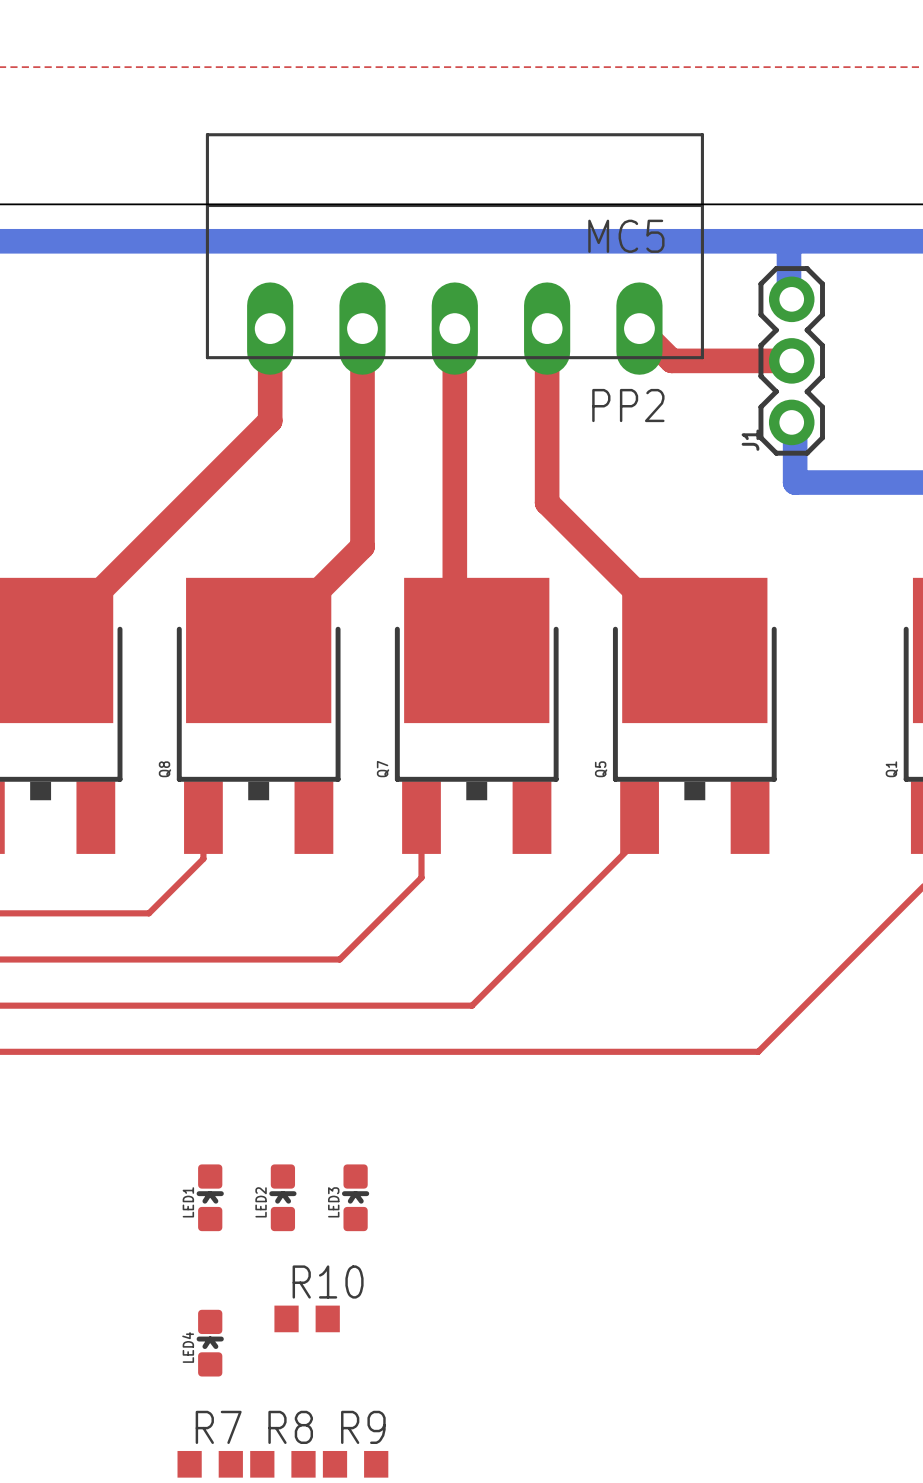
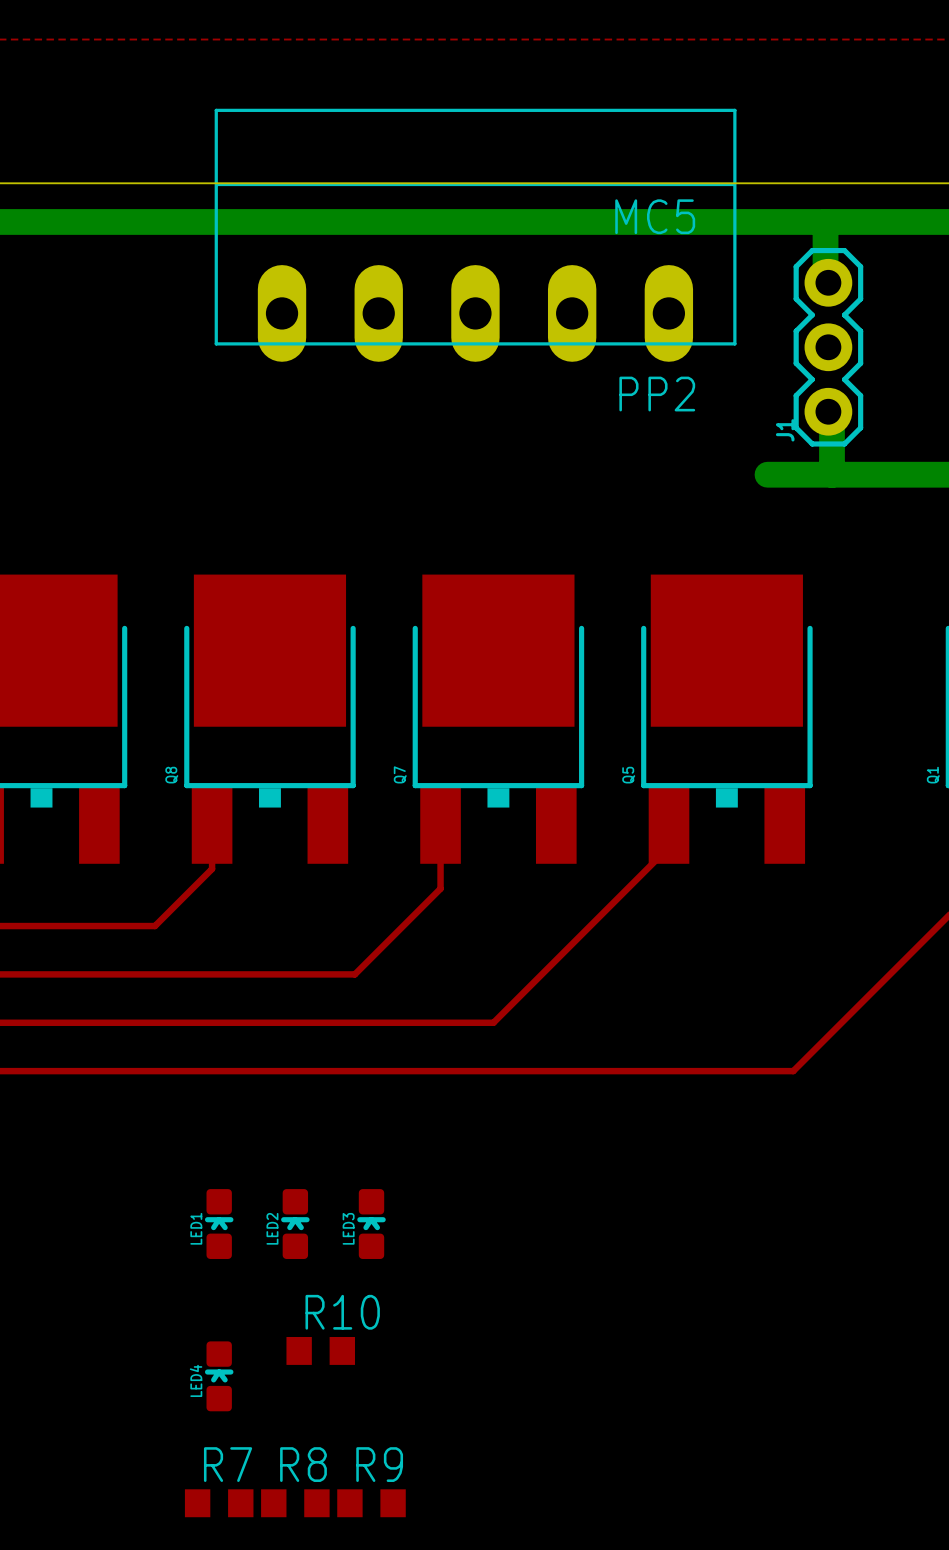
top track: (270, 328) (270, 420) (40, 650) -> none
top track: (362, 328) (362, 546) (258, 650) -> none
top track: (454, 328) (454, 628) (476, 650) -> none
top track: (547, 328) (547, 502) (694, 650) -> none
top track: (639, 328) (671, 360) (791, 360) -> none
bottom track: none -> (767, 474) (831, 474)

